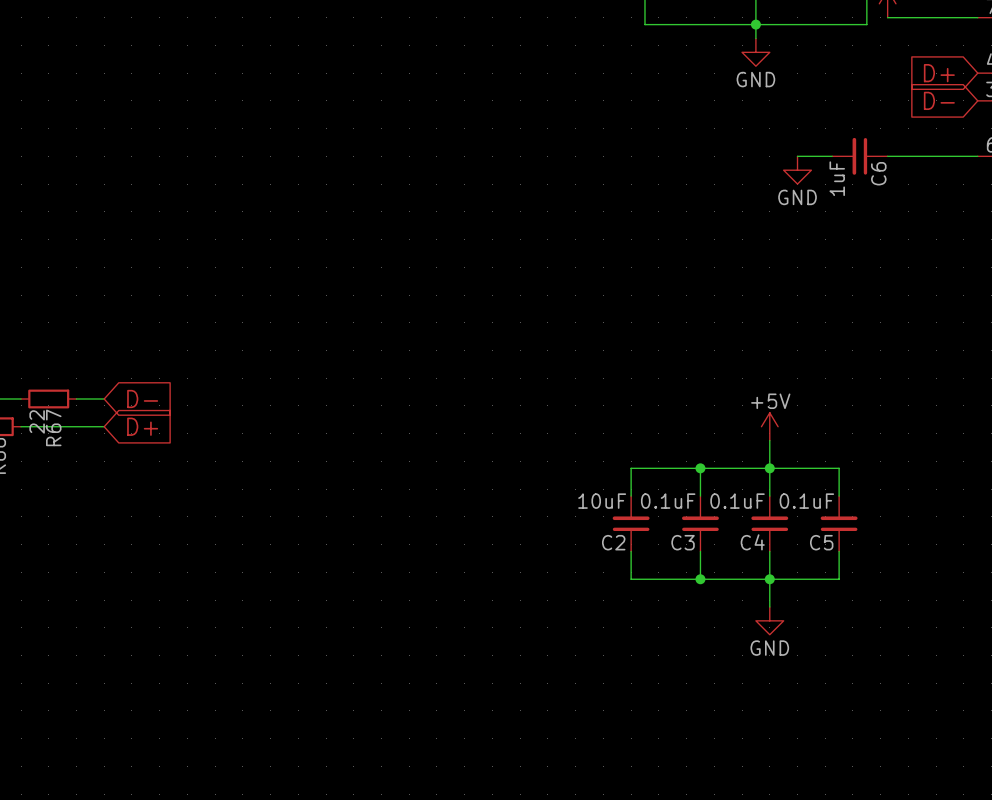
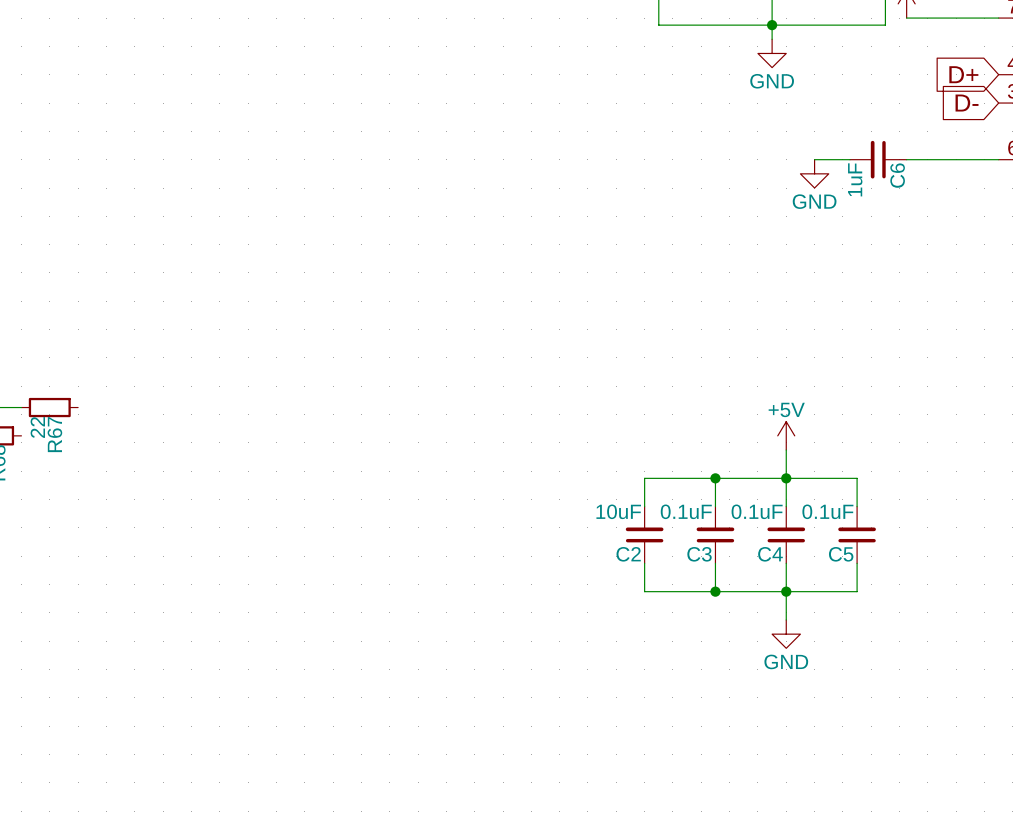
wire: (76, 399) (104, 399) -> none
global label: D- (142, 399) -> none
wire: (21, 426) (104, 426) -> none
global label: D+ (142, 426) -> none

